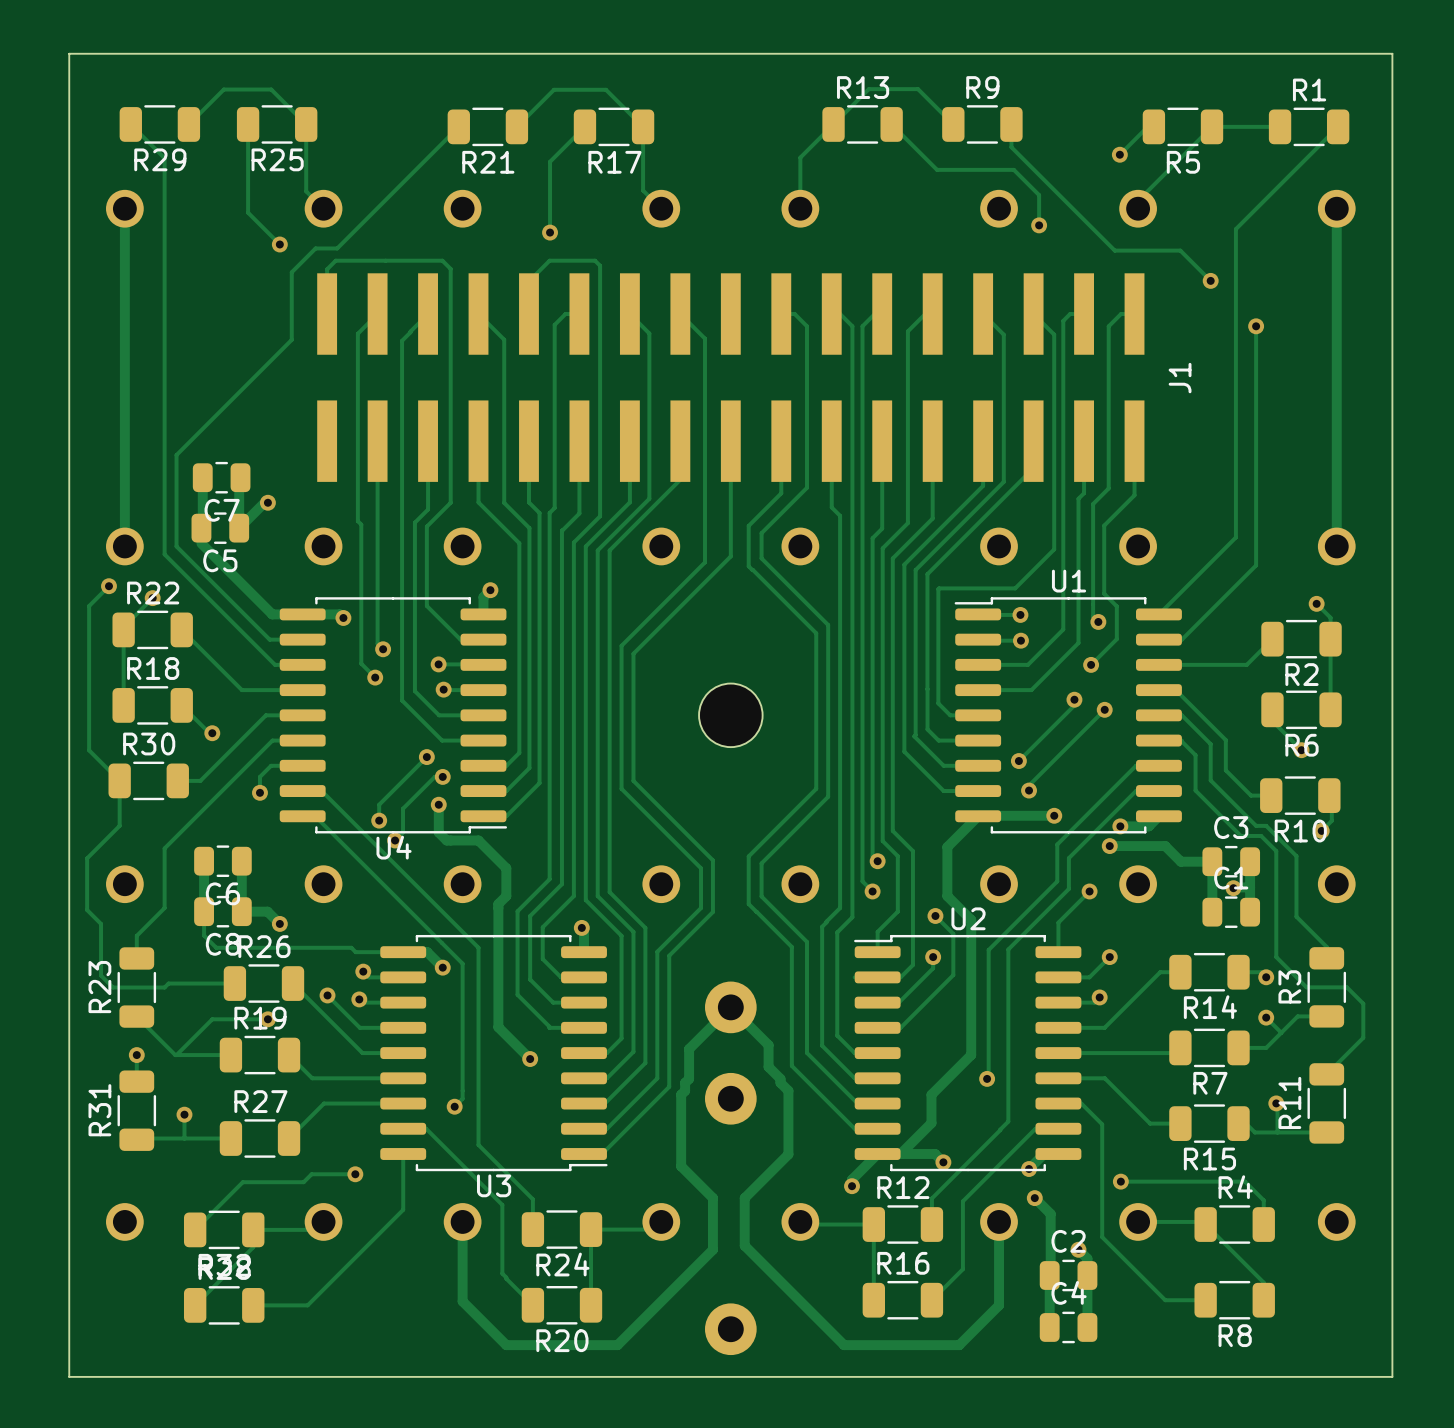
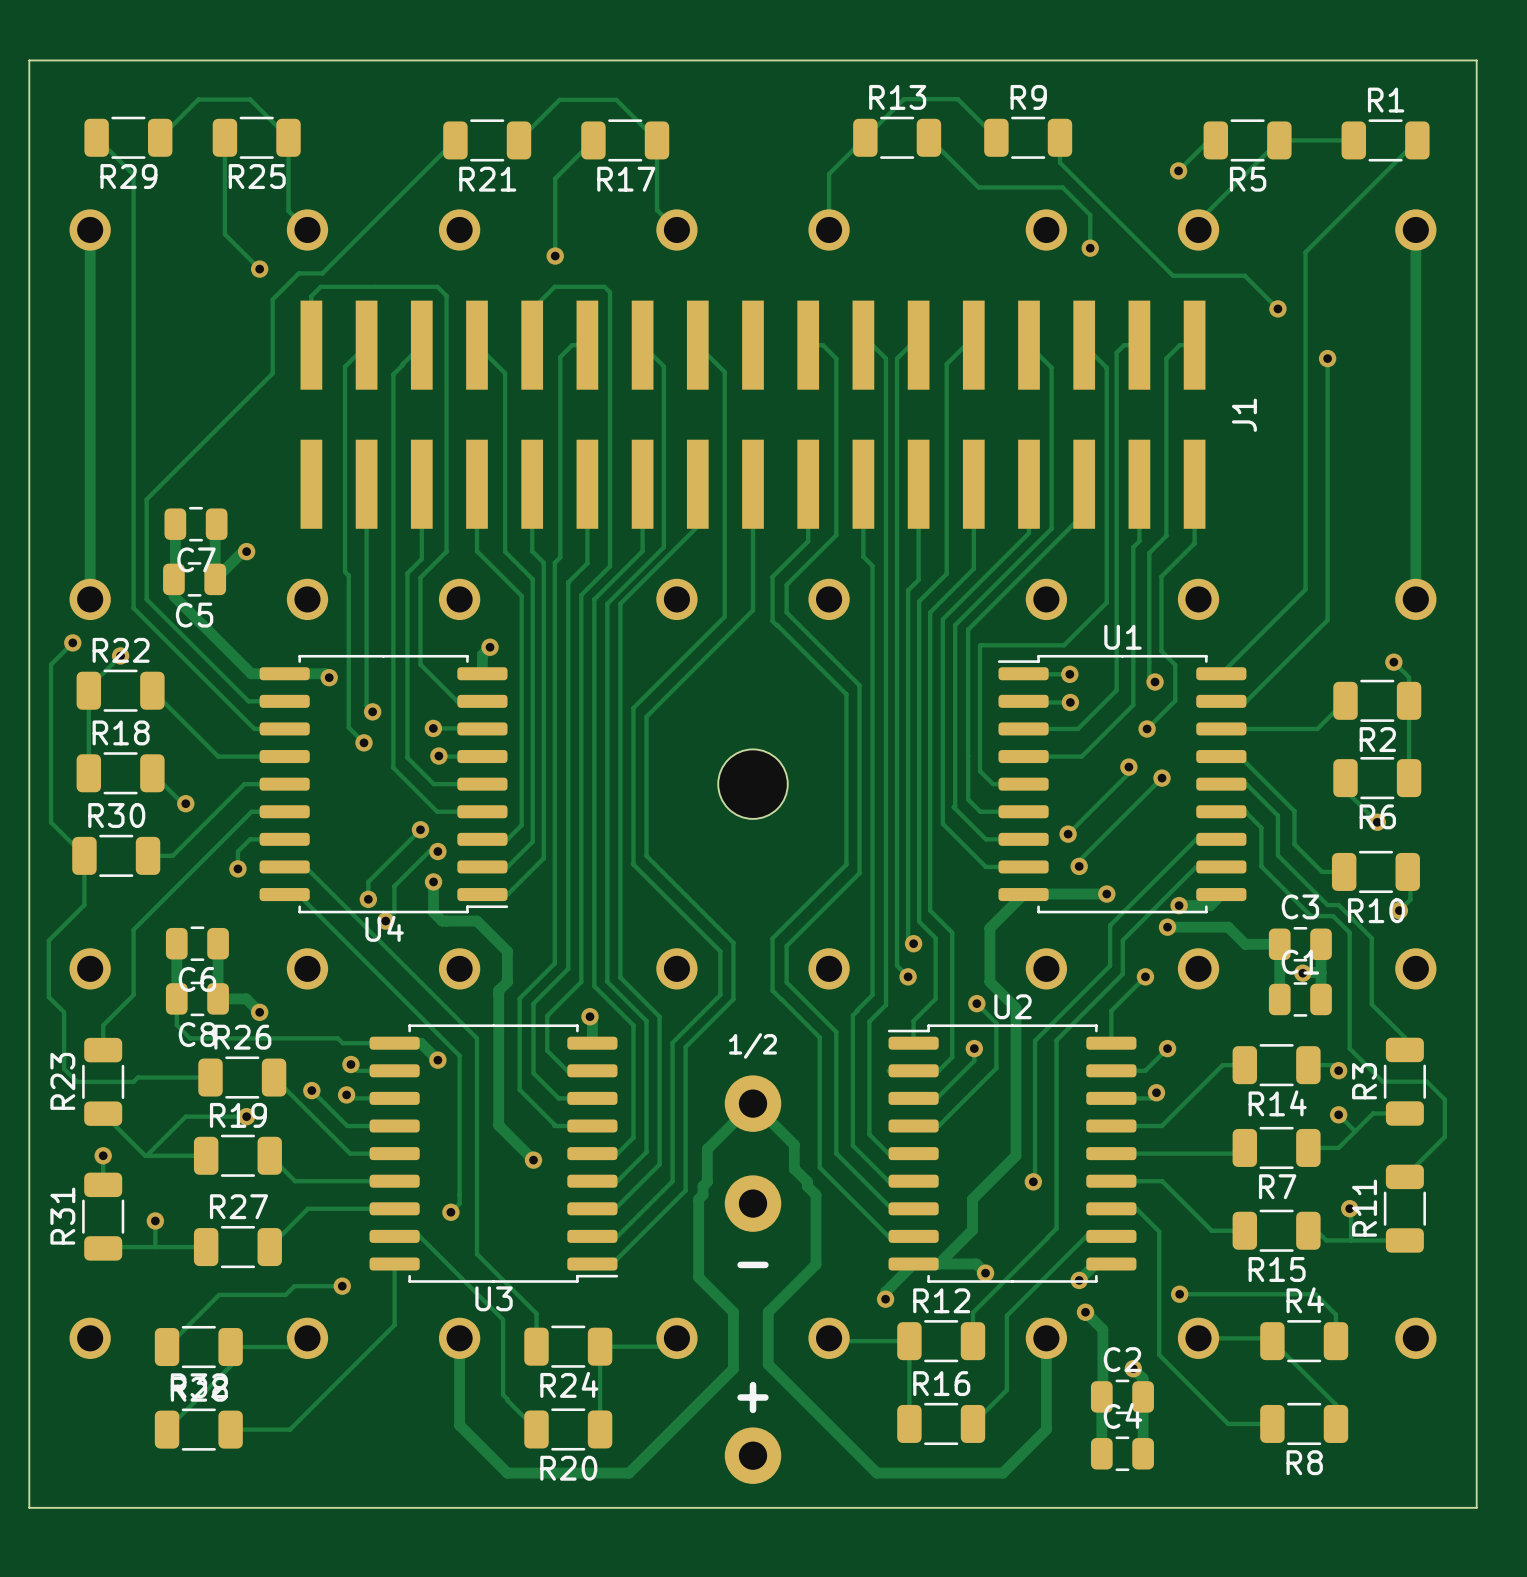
text: none -> 1/2 (753, 1045)
text: none -> - (753, 1264)
text: none -> + (753, 1397)

